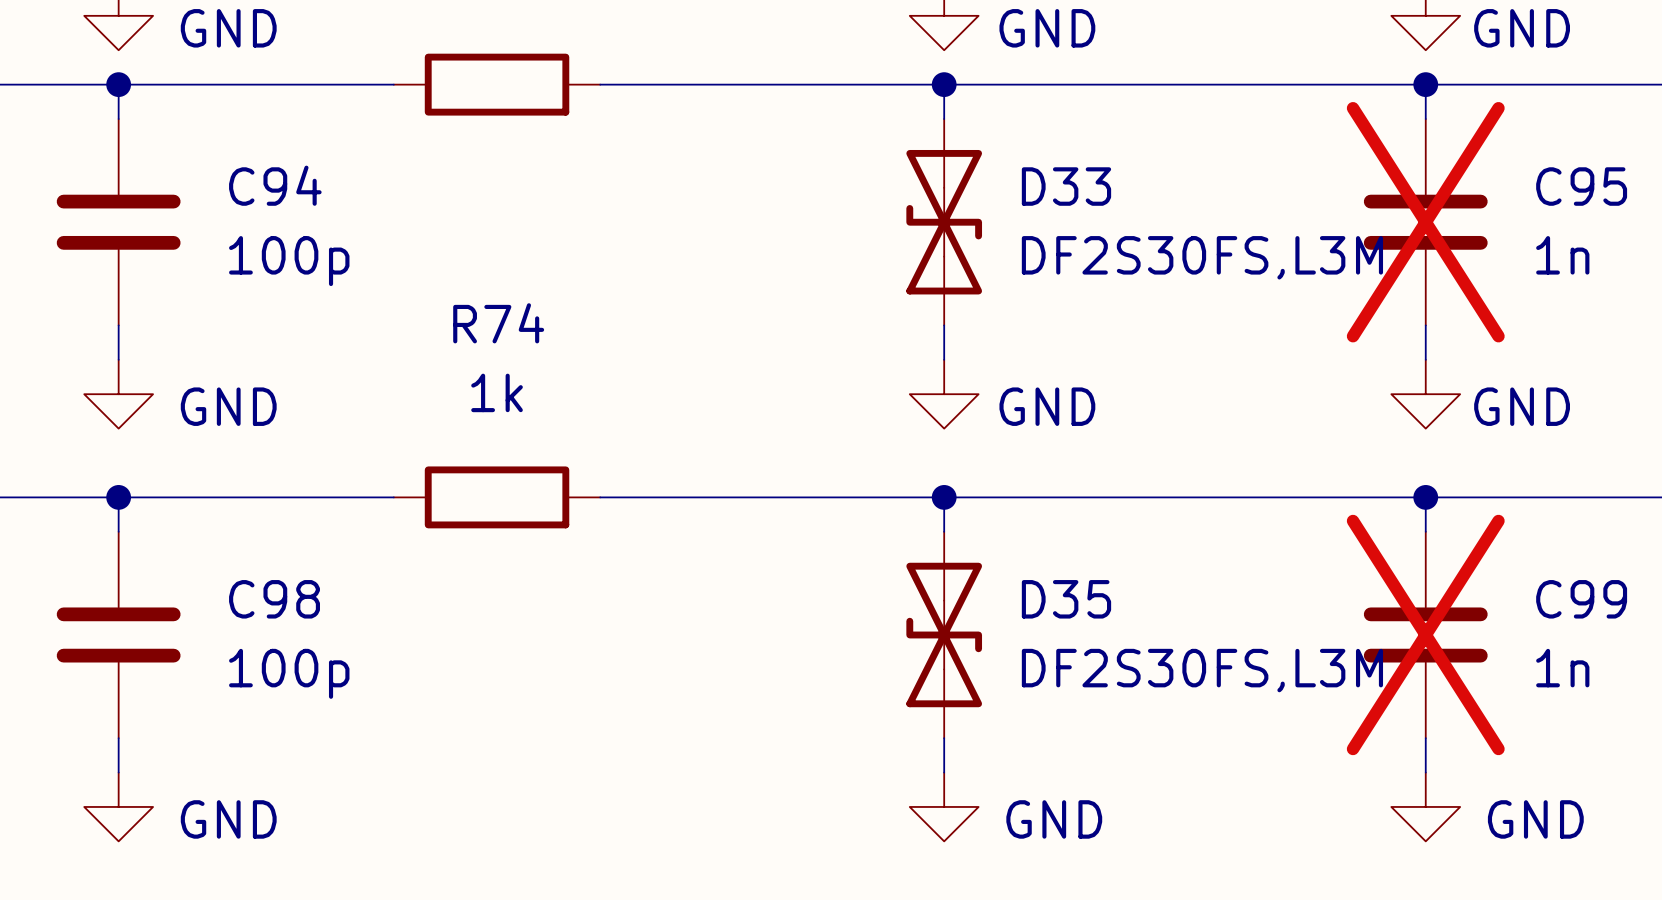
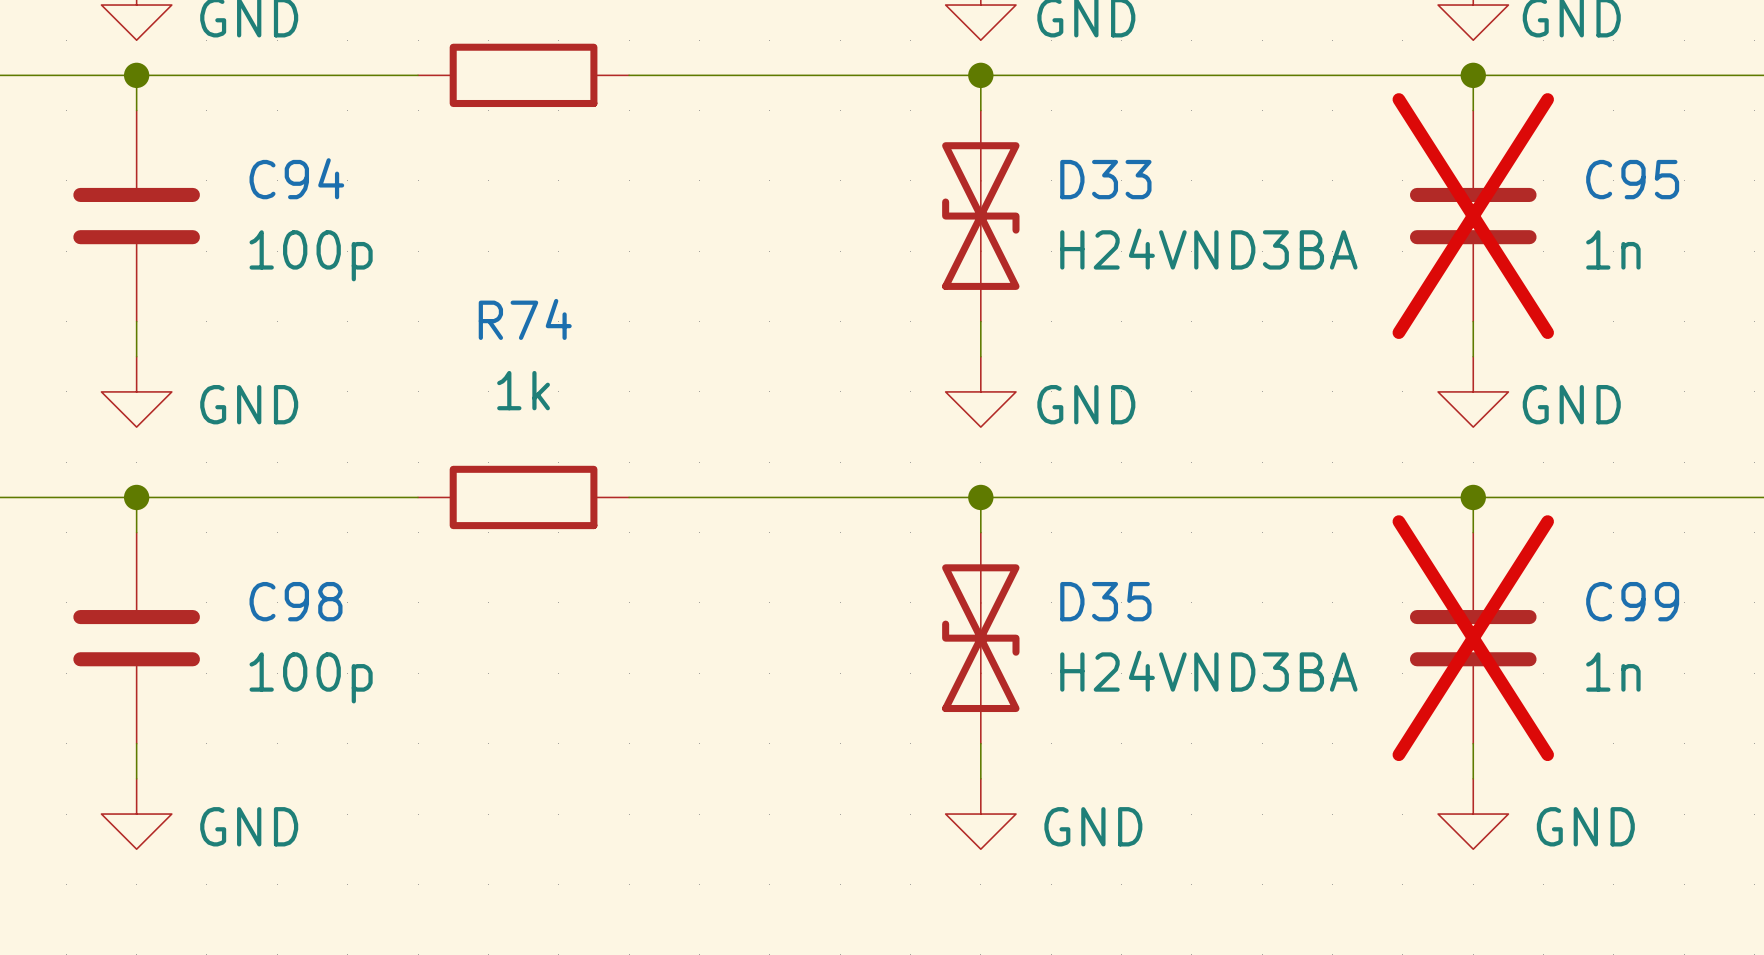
D33 value: DF2S30FS,L3M (1202, 257) -> H24VND3BA (1208, 249)
D35 value: DF2S30FS,L3M (1202, 670) -> H24VND3BA (1208, 671)

